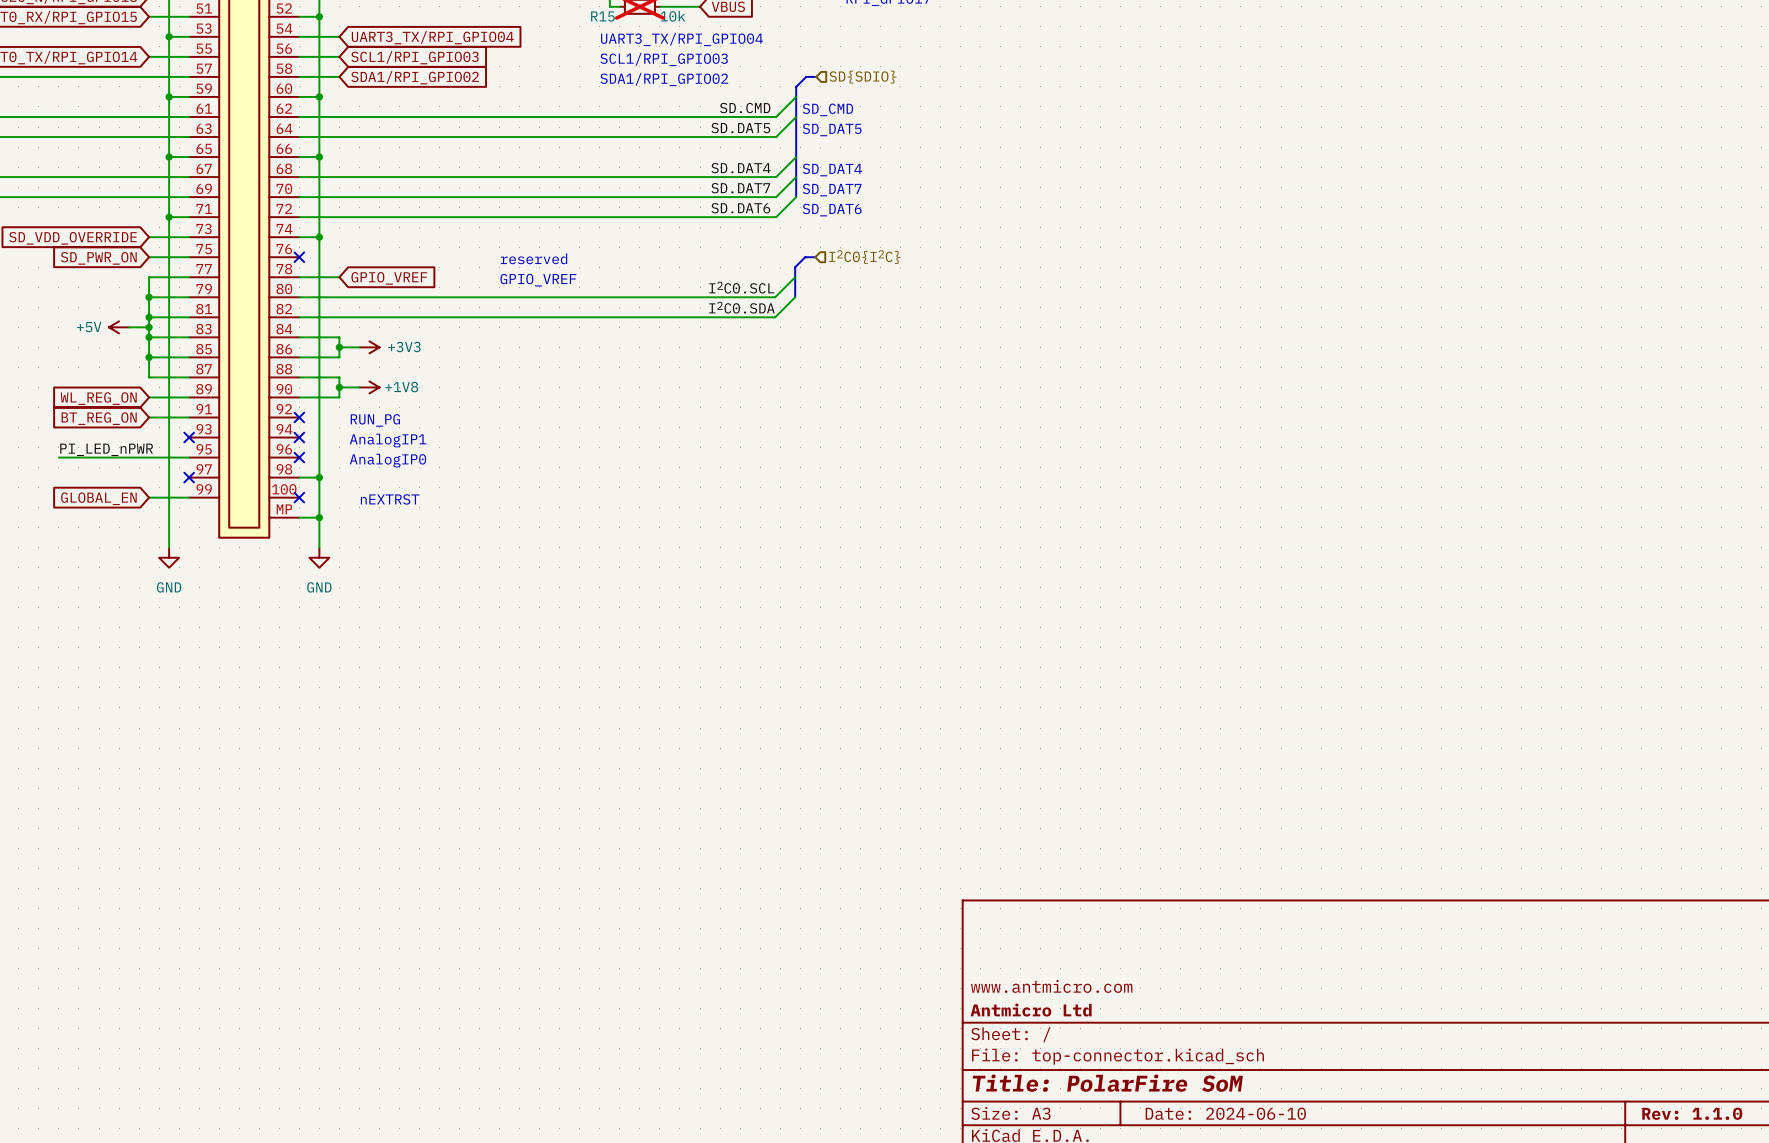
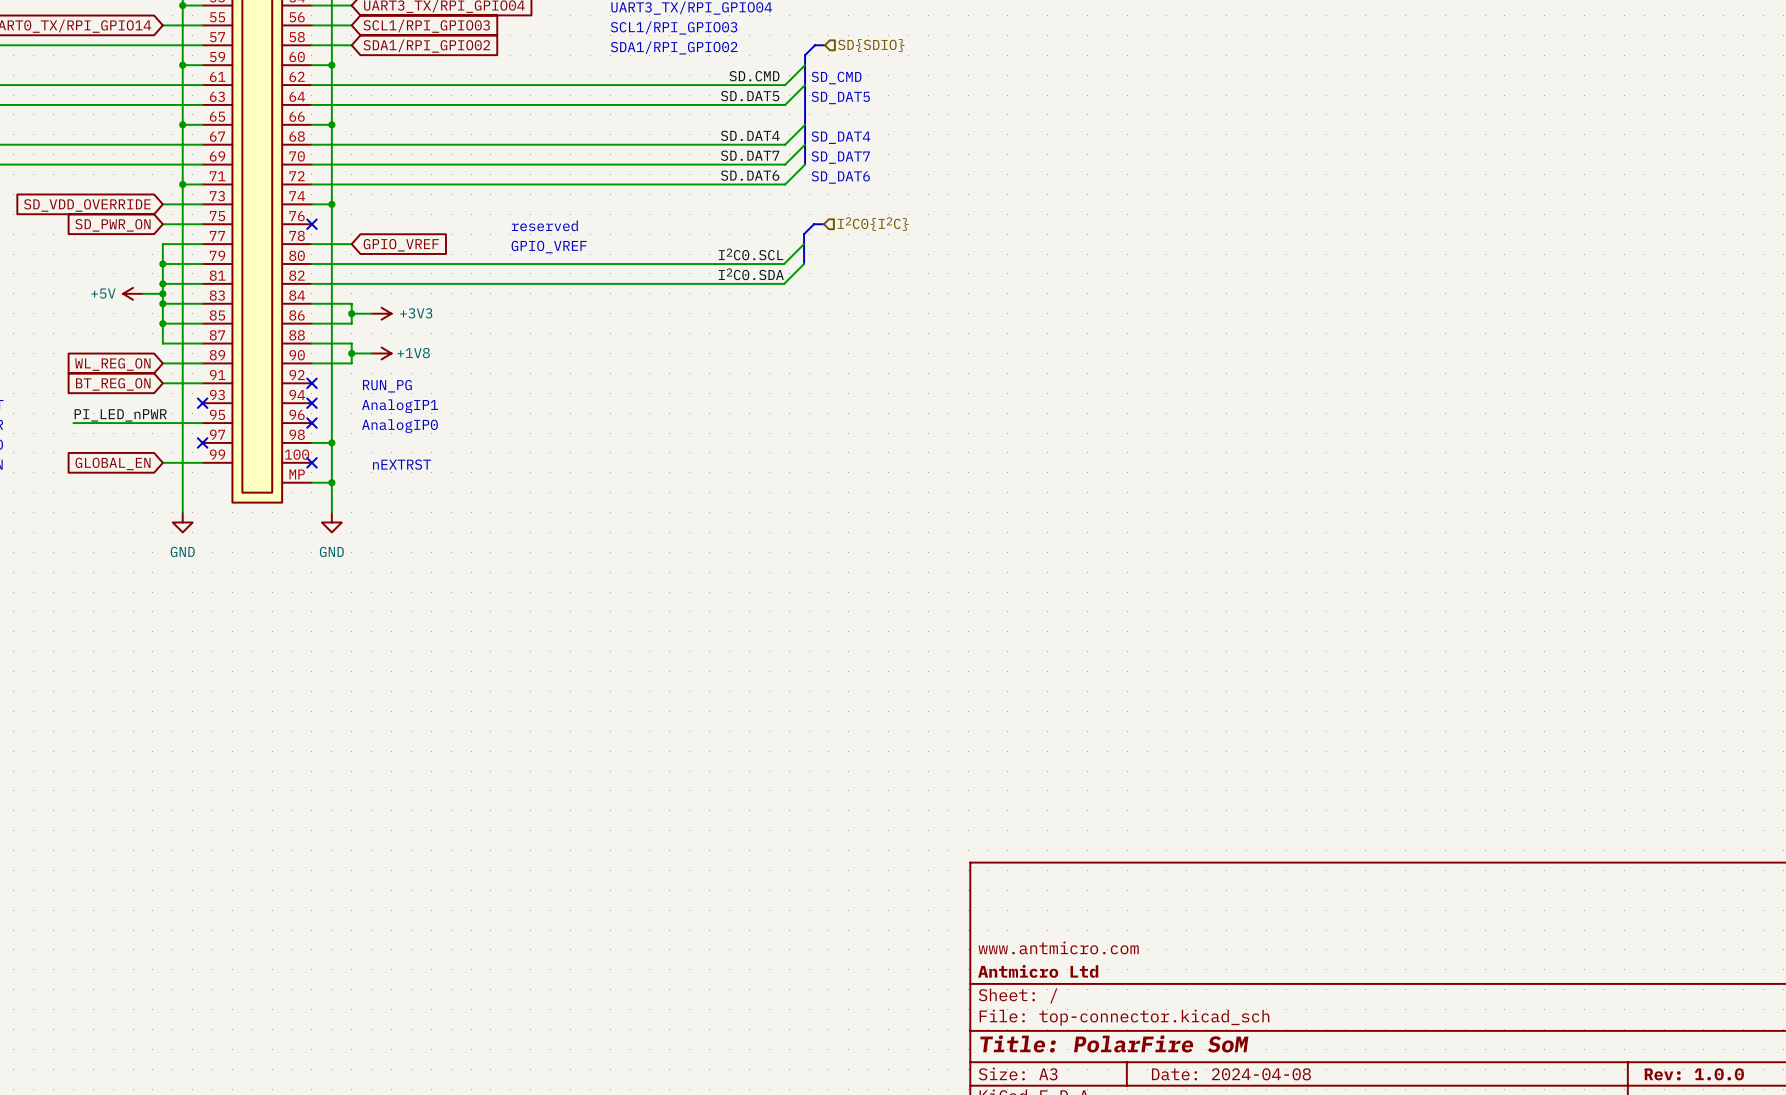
title block: Date: 2024-06-10 (1225, 1113) -> Date: 2024-04-08 (1231, 1074)
title block: Rev: 1.1.0 (1692, 1113) -> Rev: 1.0.0 (1694, 1074)

